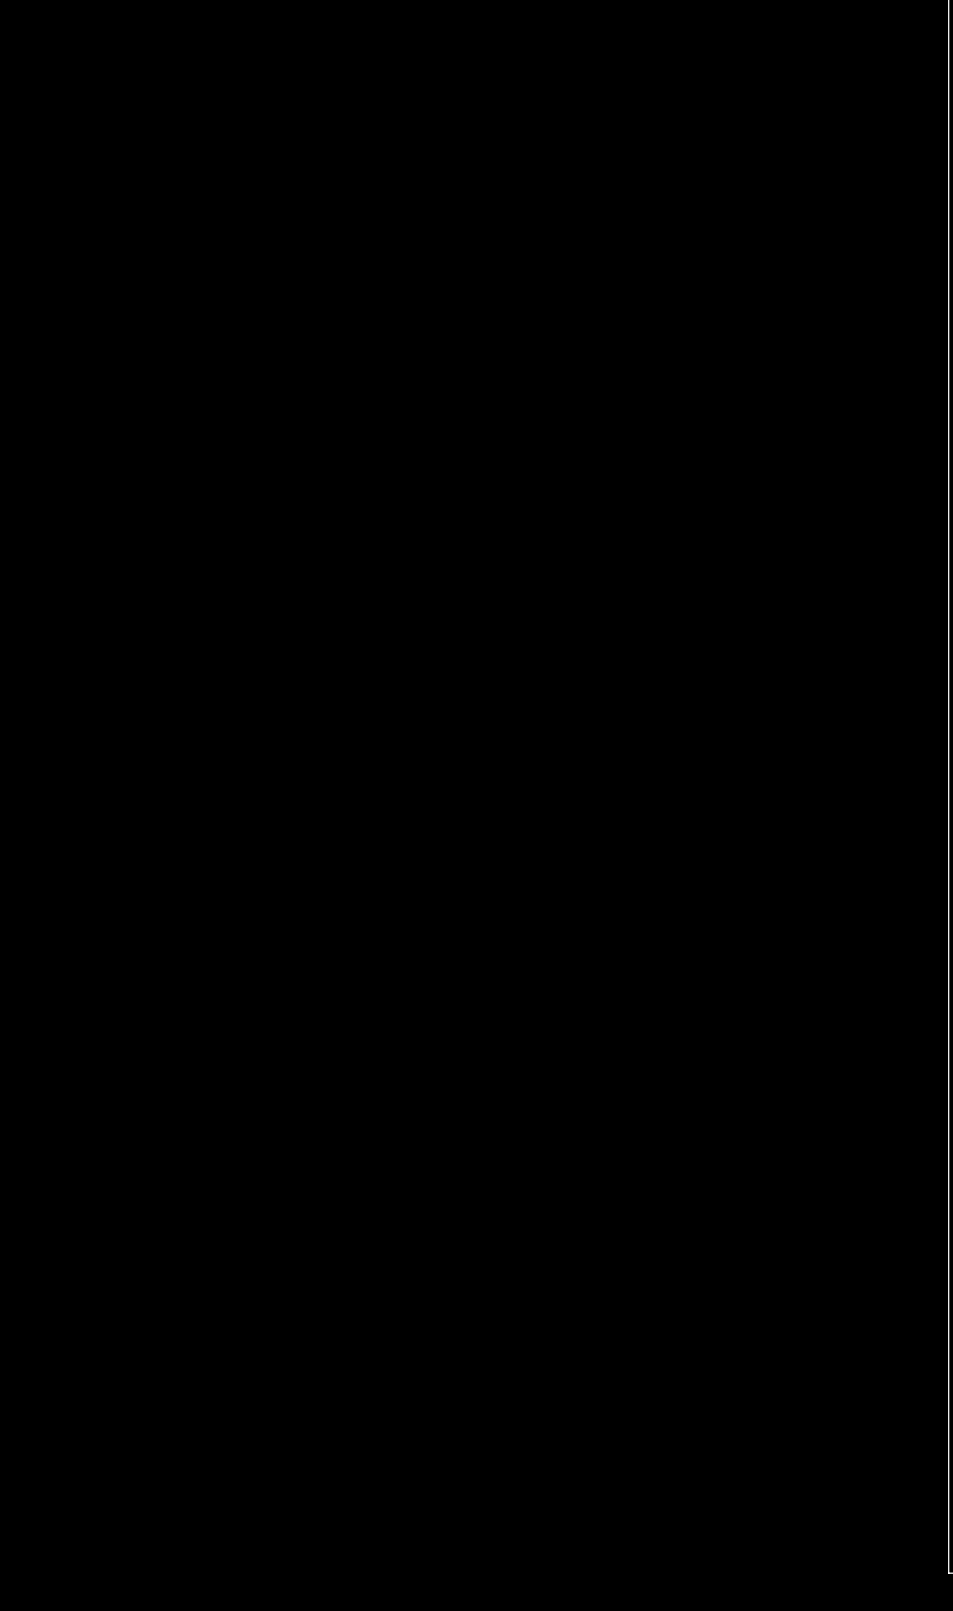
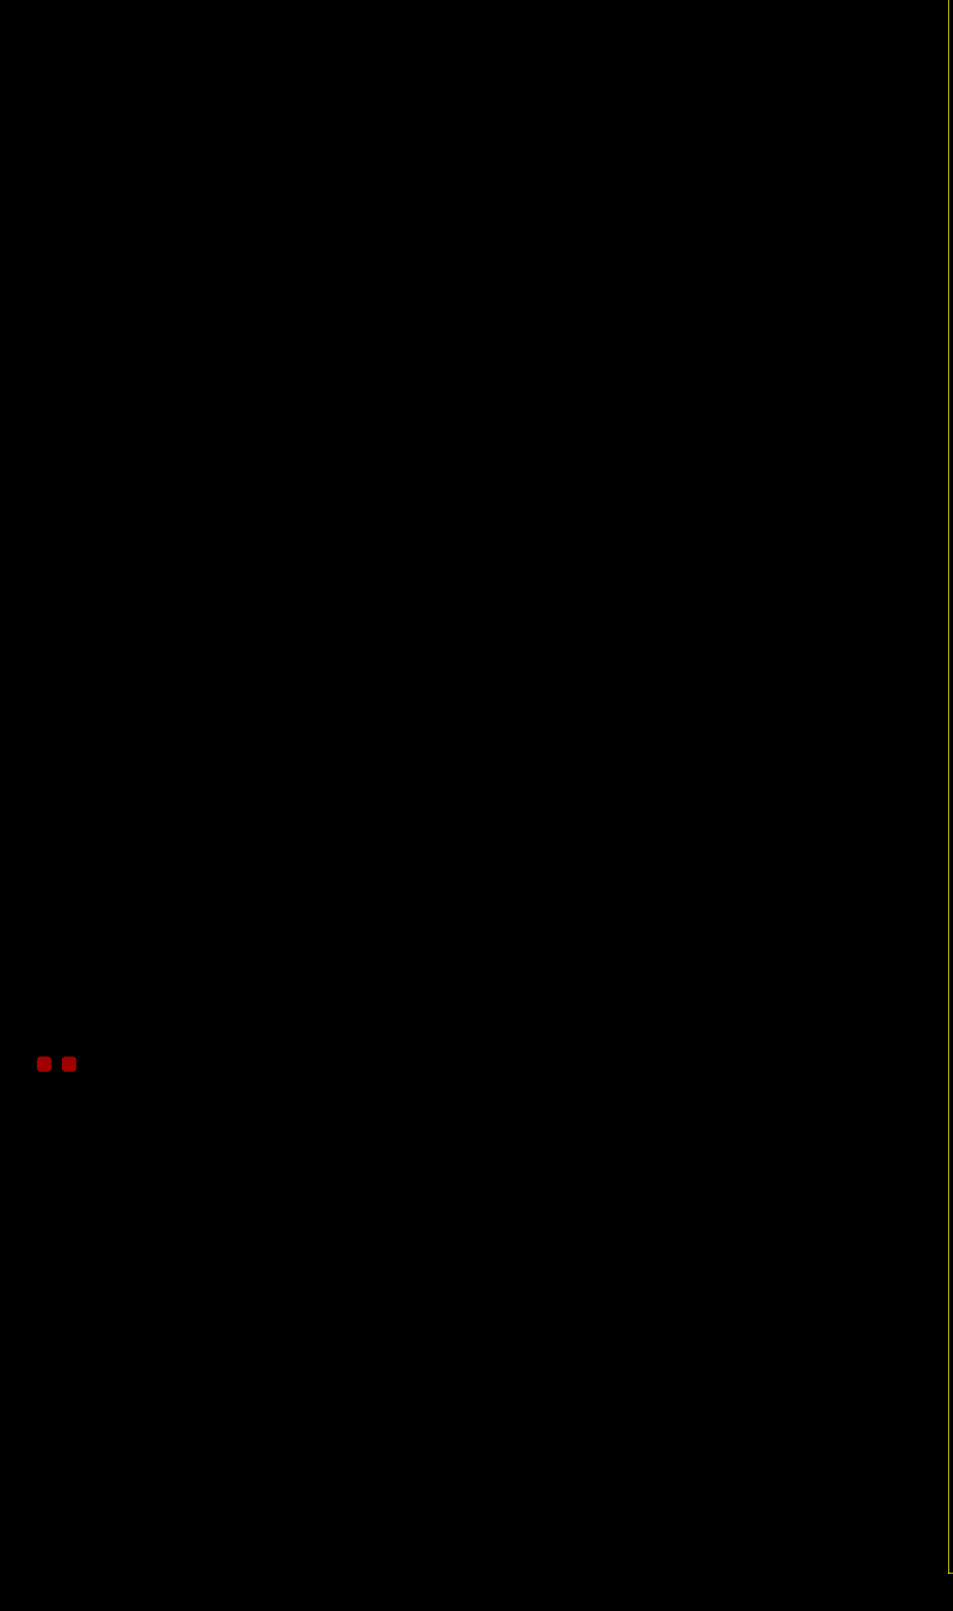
part: none -> (56, 1064)

